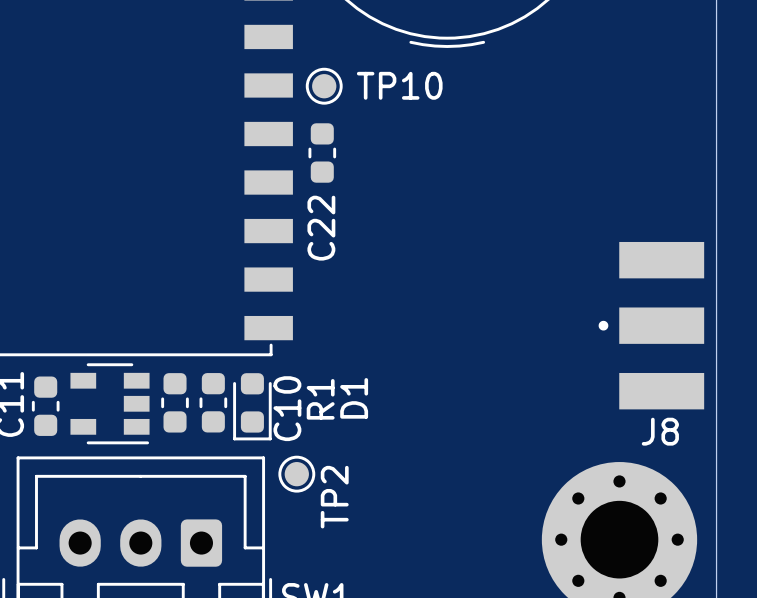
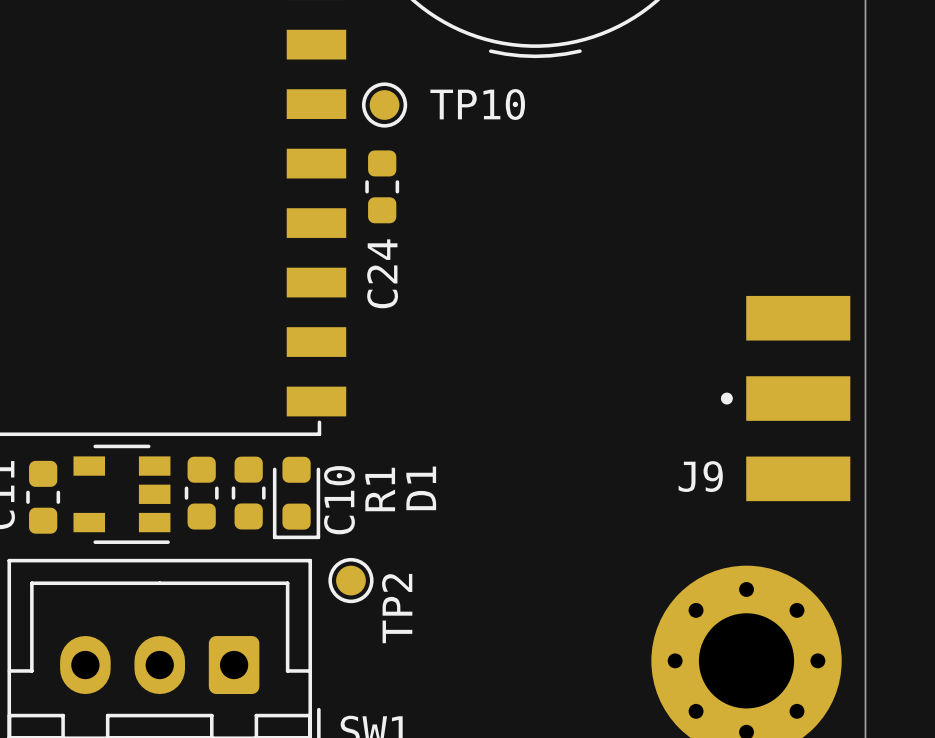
C22 name: C22 (321, 228) -> C24 (382, 273)
J8 name: J8 (660, 431) -> J9 (700, 476)

